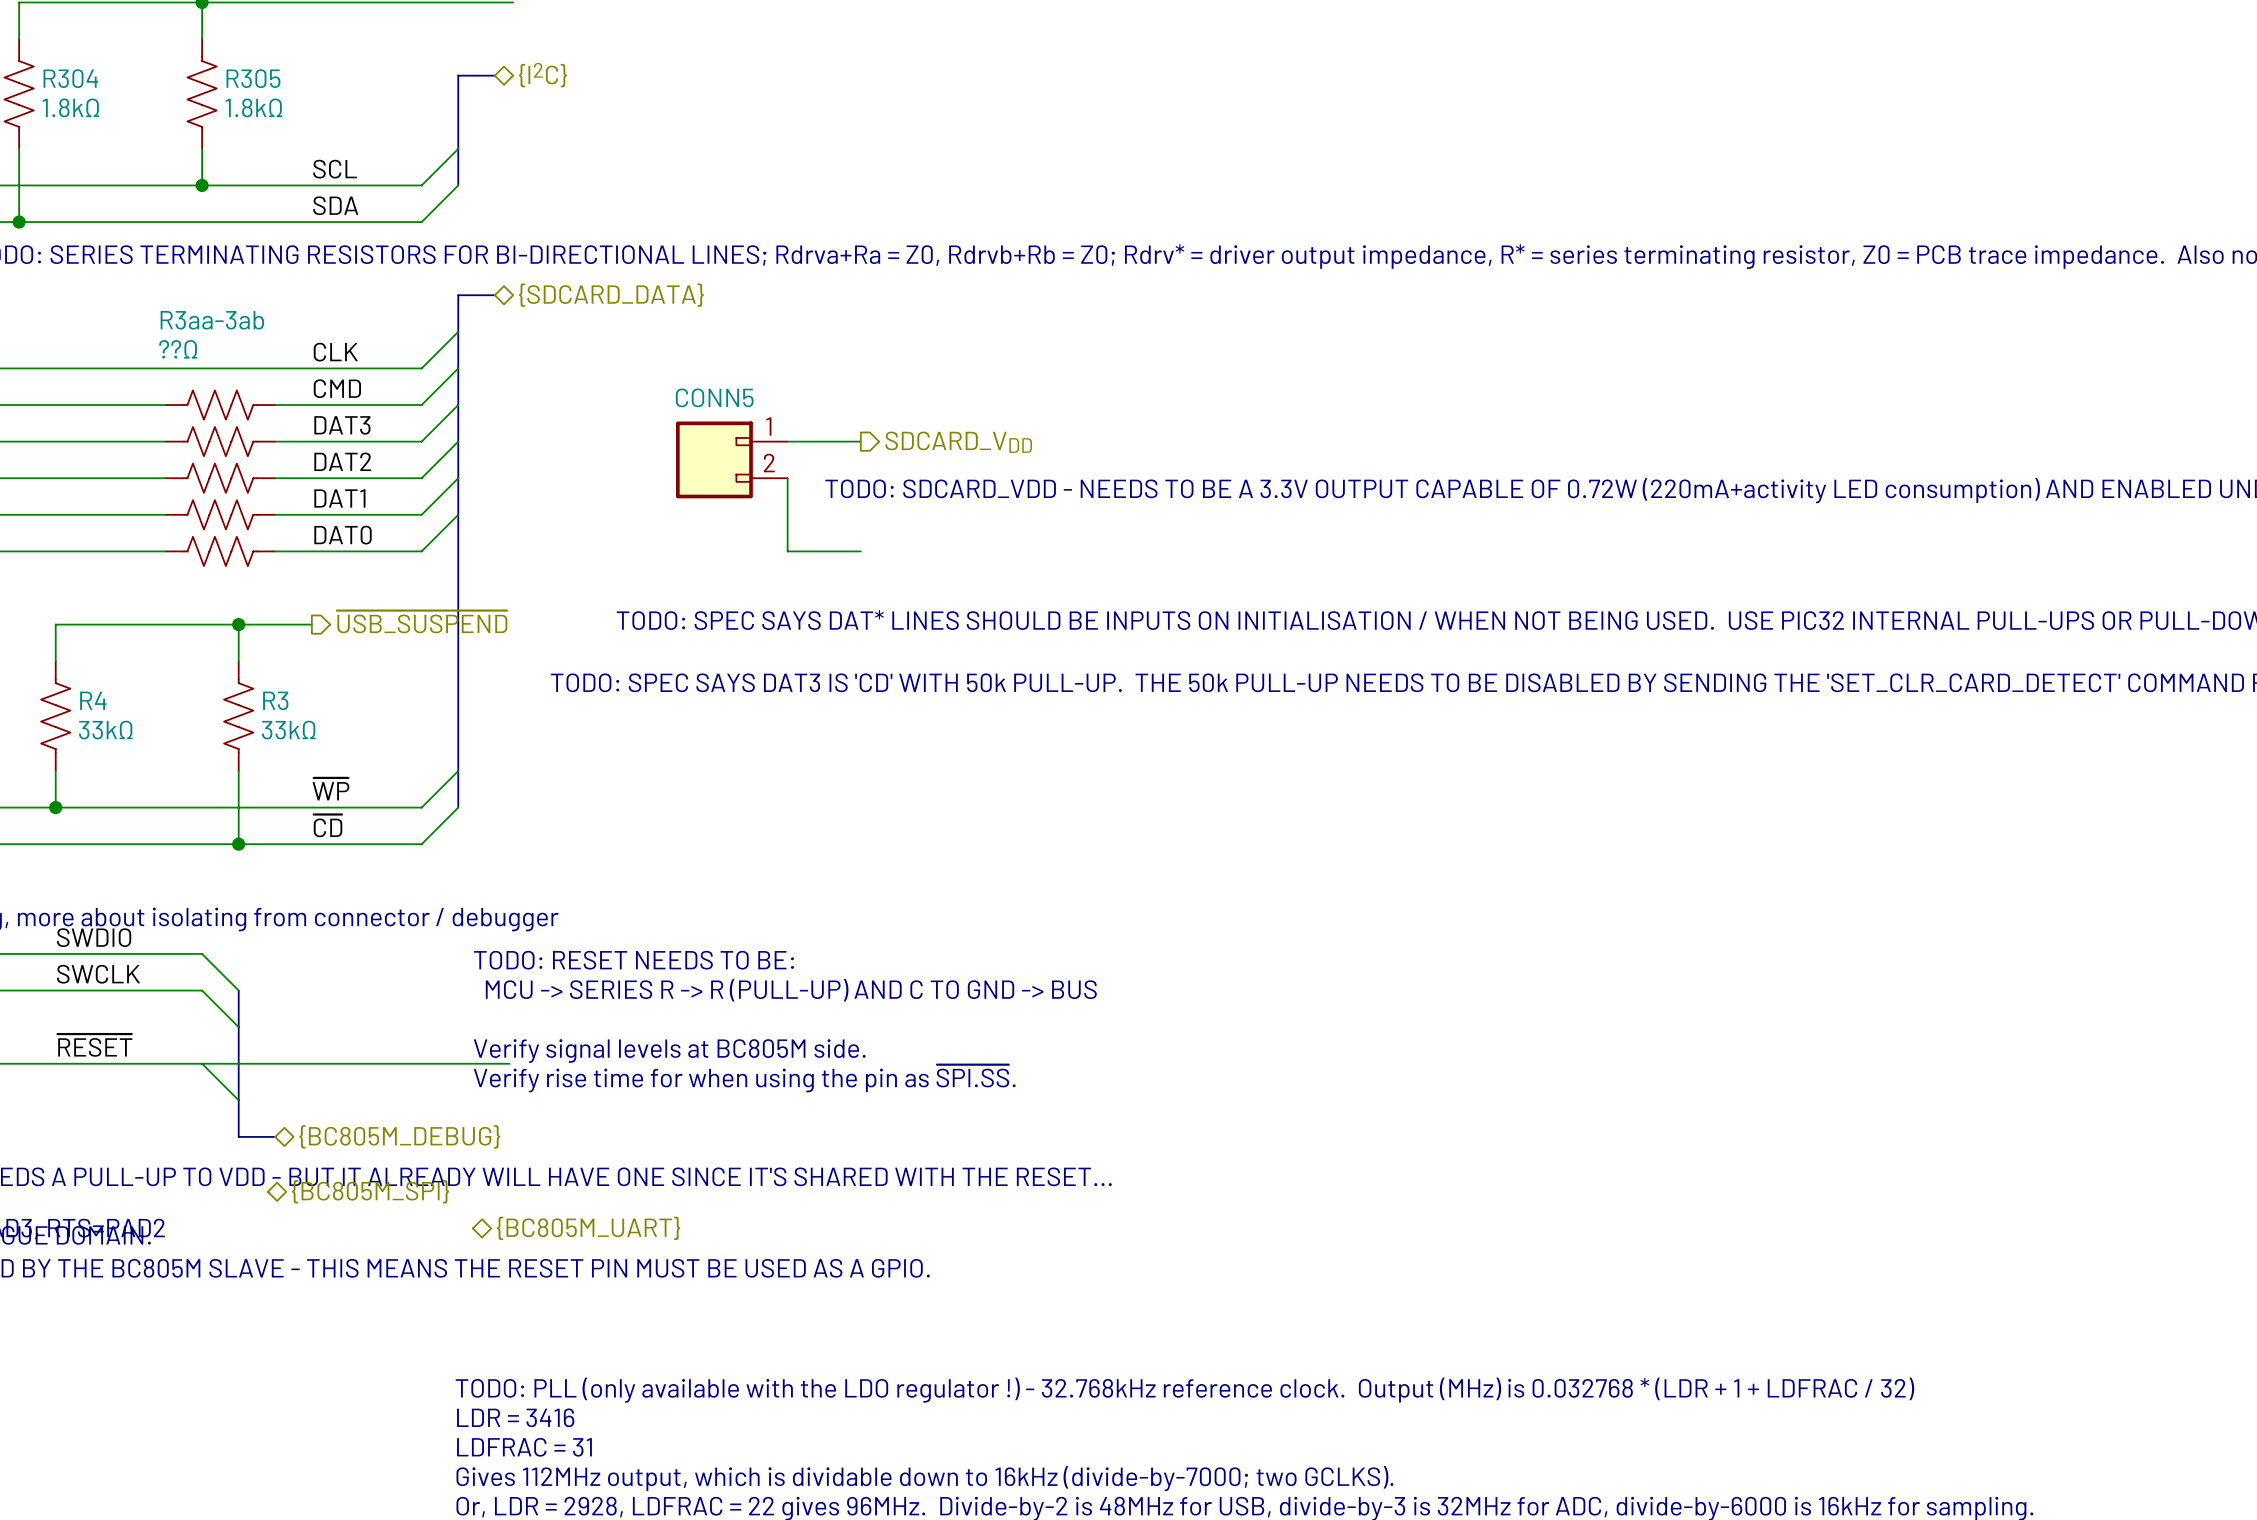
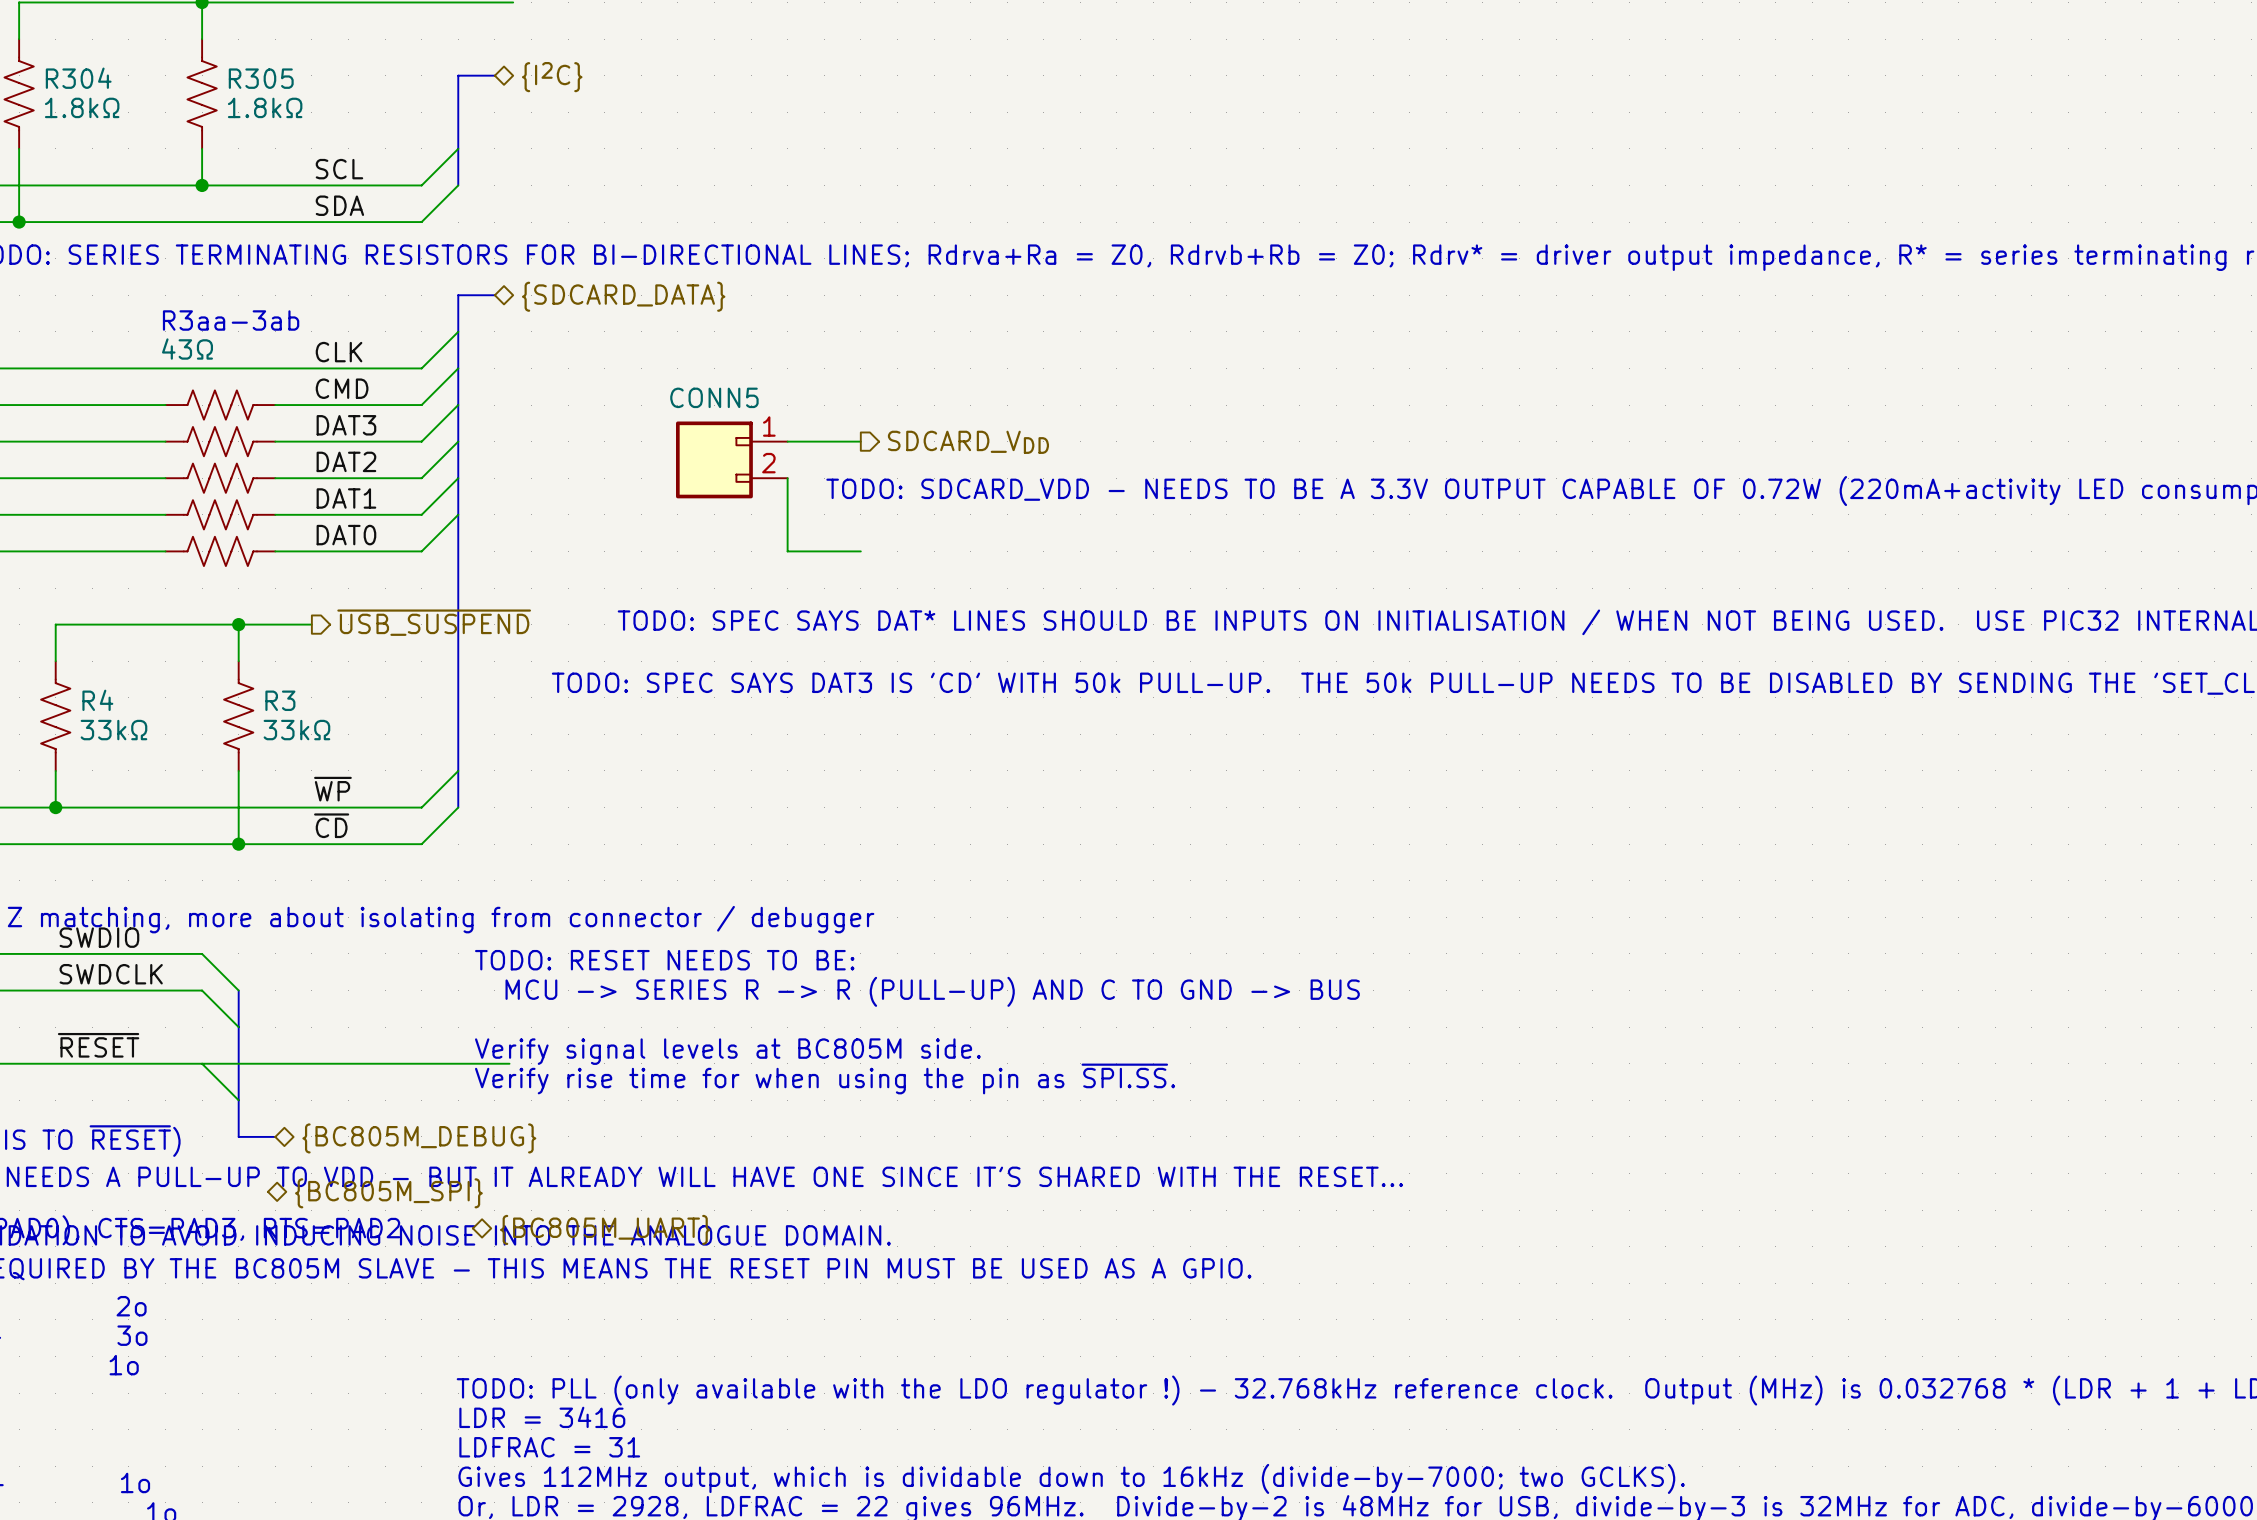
R3aa-3ab name: R3aa-3ab (212, 320) -> none
text: none -> R3aa-3ab (231, 320)
R3aa-3ab value: ??Ω (178, 349) -> 43Ω (187, 349)
label: SWCLK (98, 974) -> SWDCLK (111, 974)

